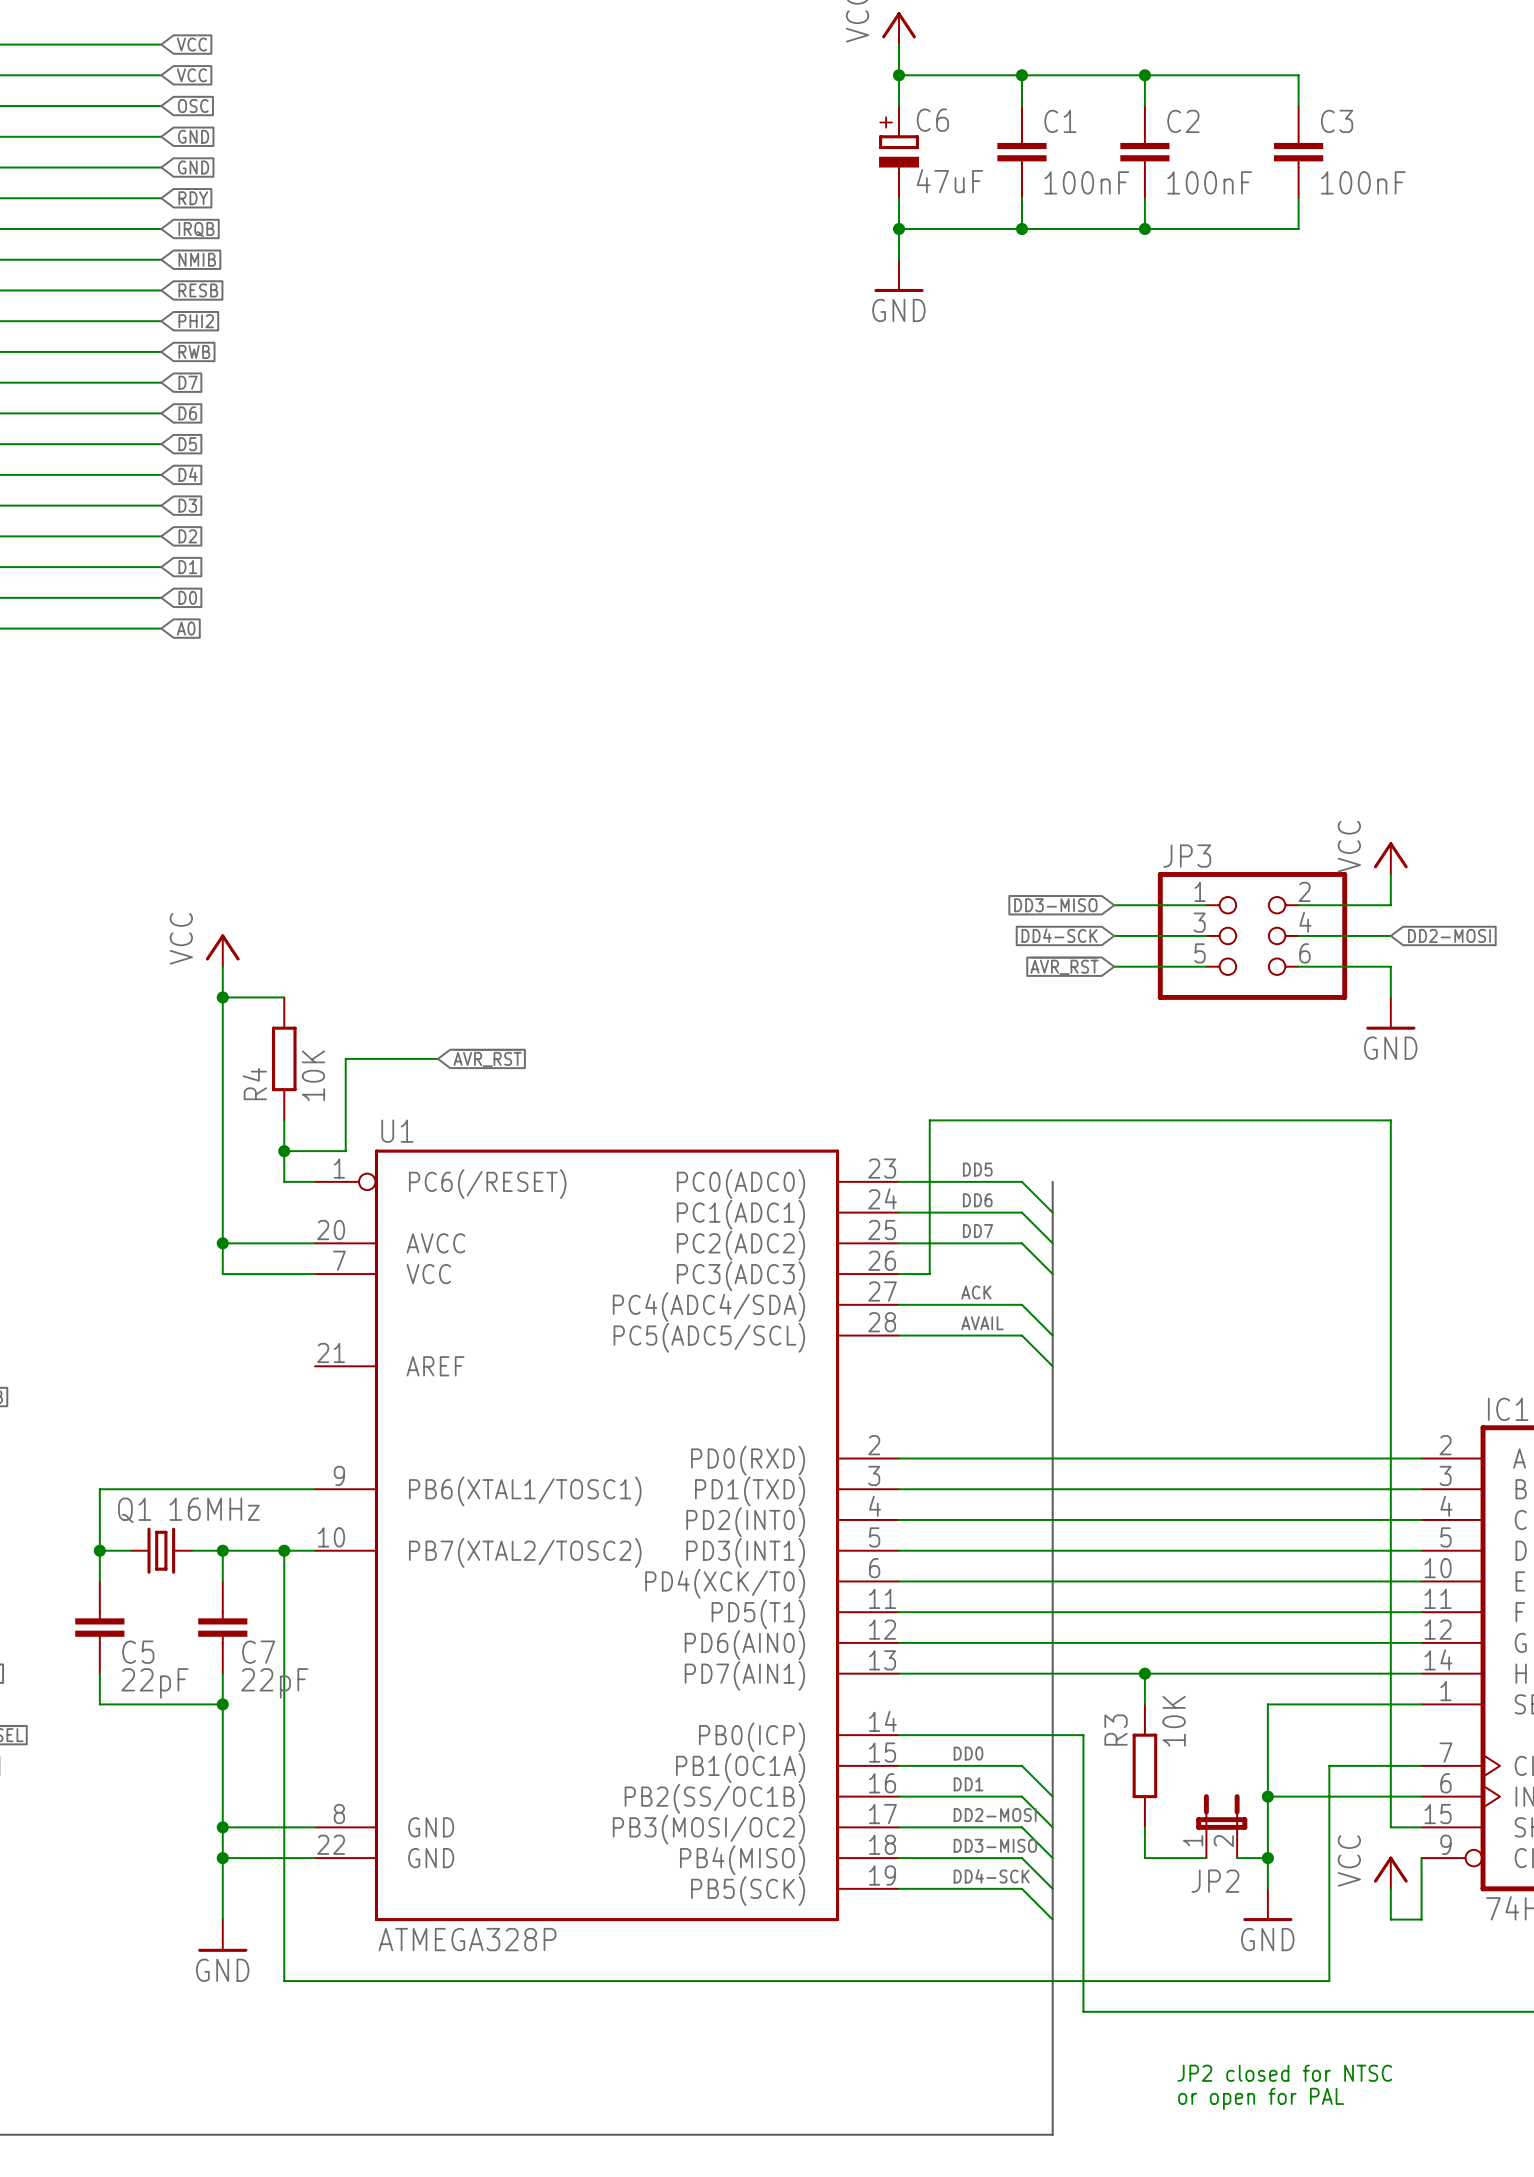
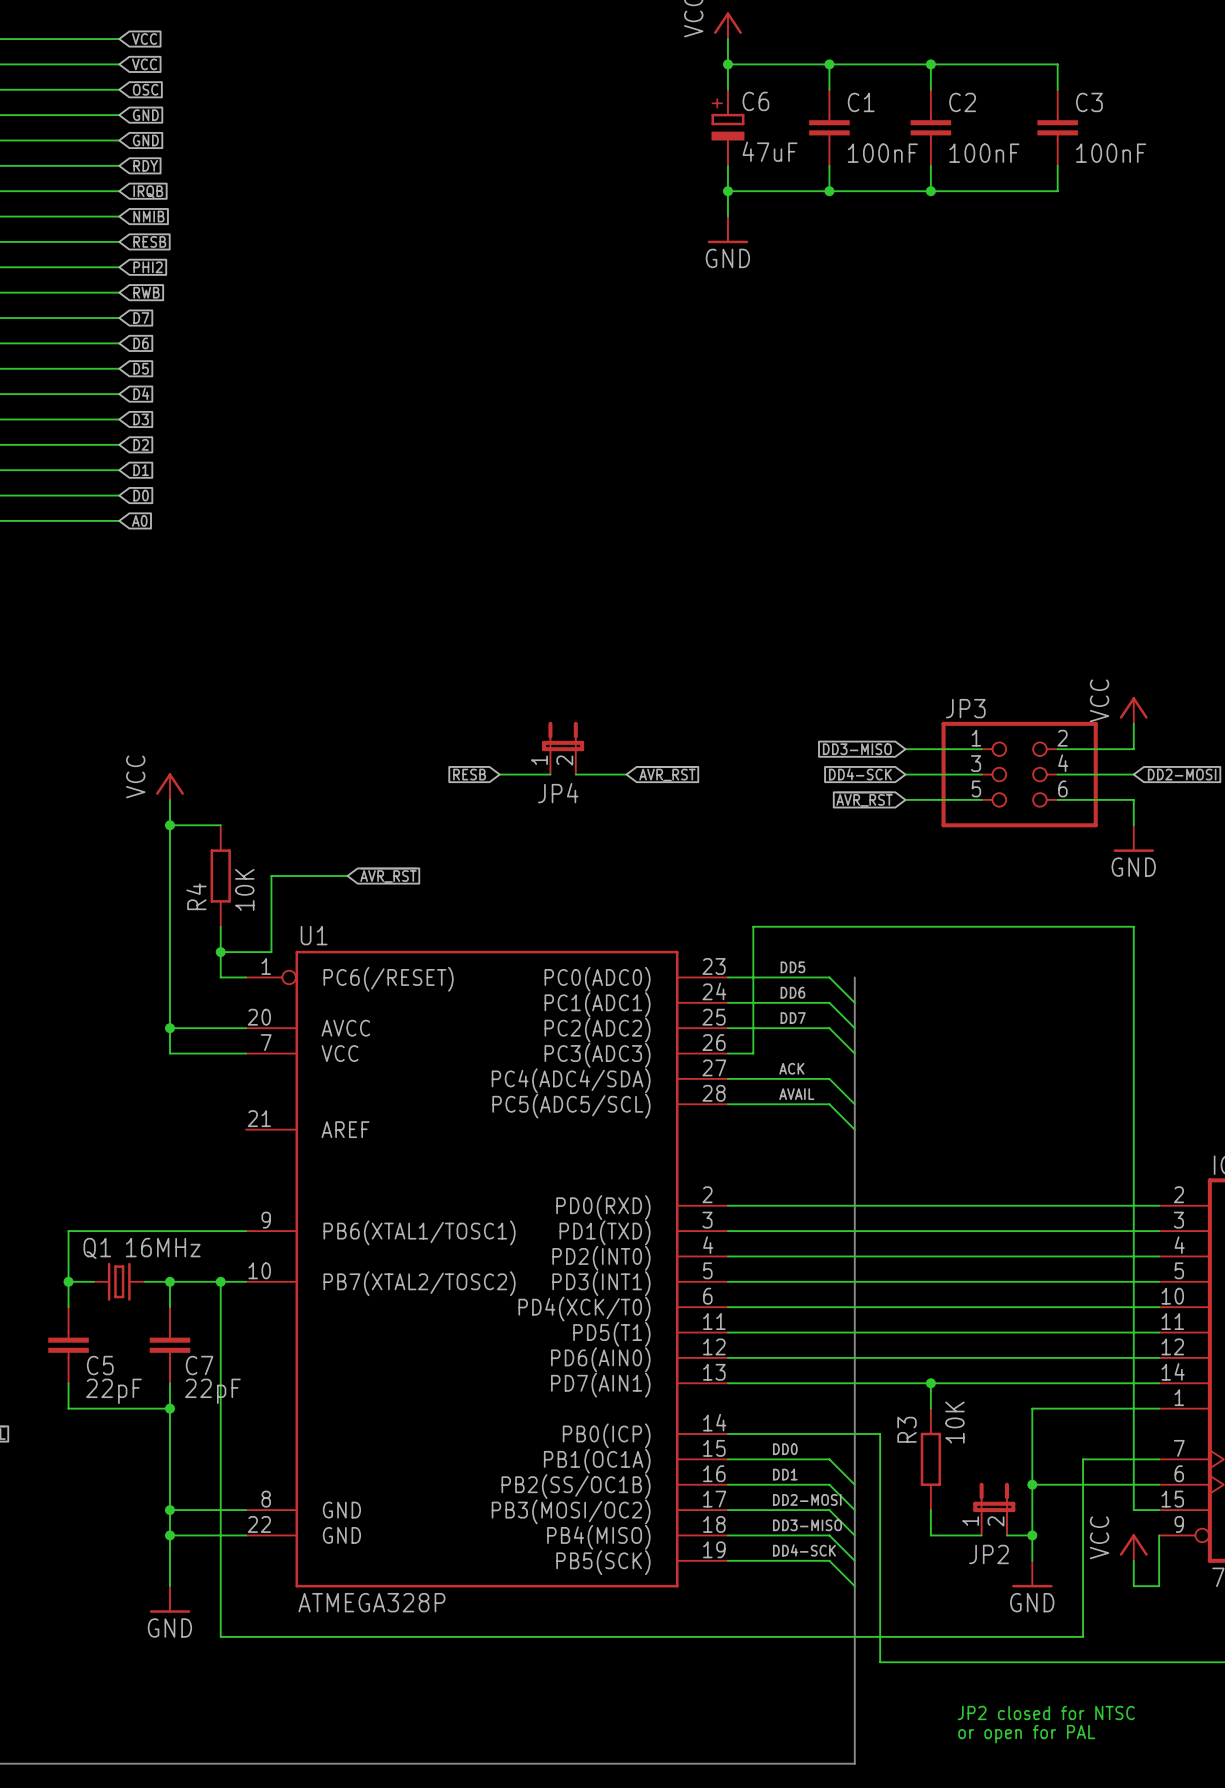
JP4: none -> (563, 748)
global label: none -> RESB (469, 774)
wire: none -> (499, 774) (550, 774)
wire: none -> (575, 774) (626, 774)
global label: none -> ~{AVR_RST} (667, 773)

